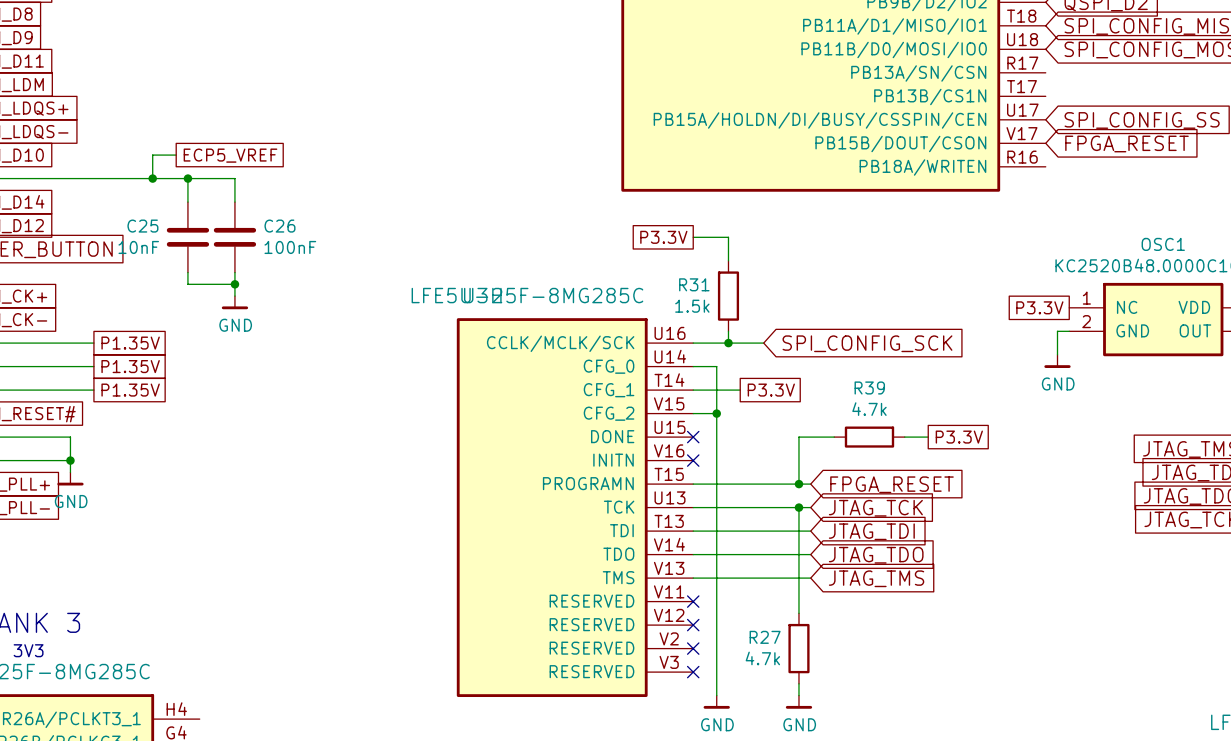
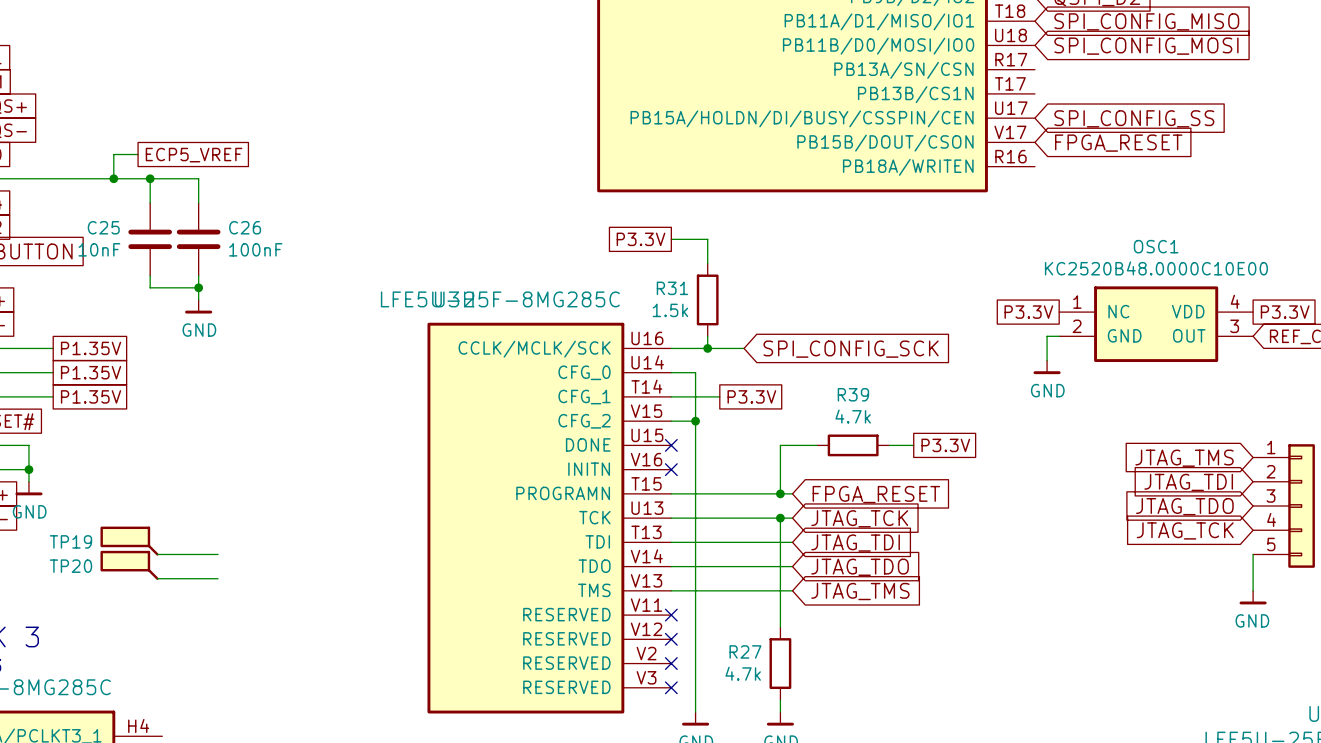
TP19: none -> (129, 541)
wire: none -> (157, 554) (218, 554)
TP20: none -> (129, 565)
wire: none -> (157, 578) (218, 578)

